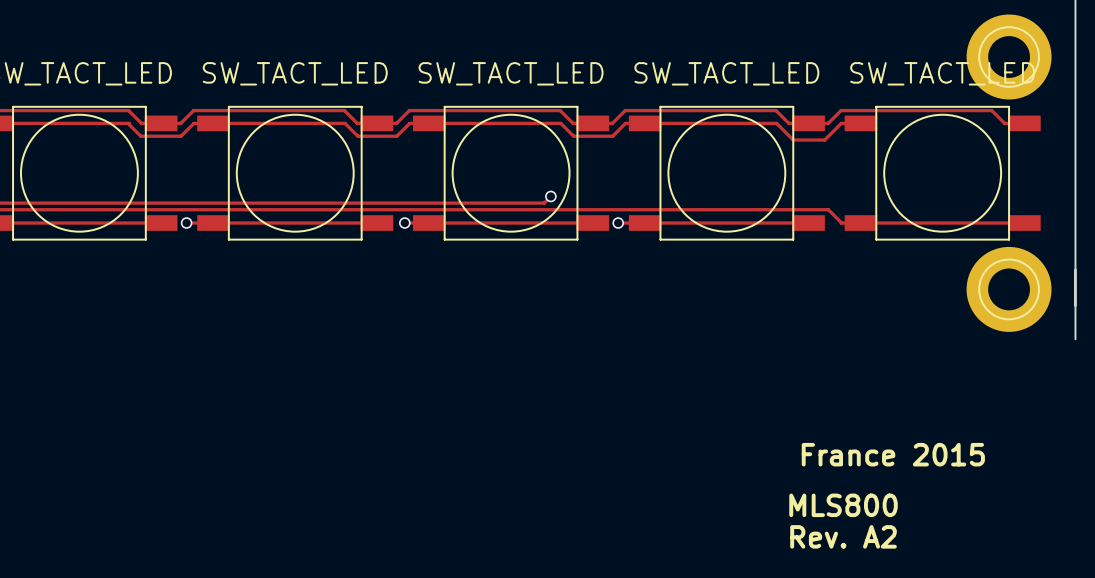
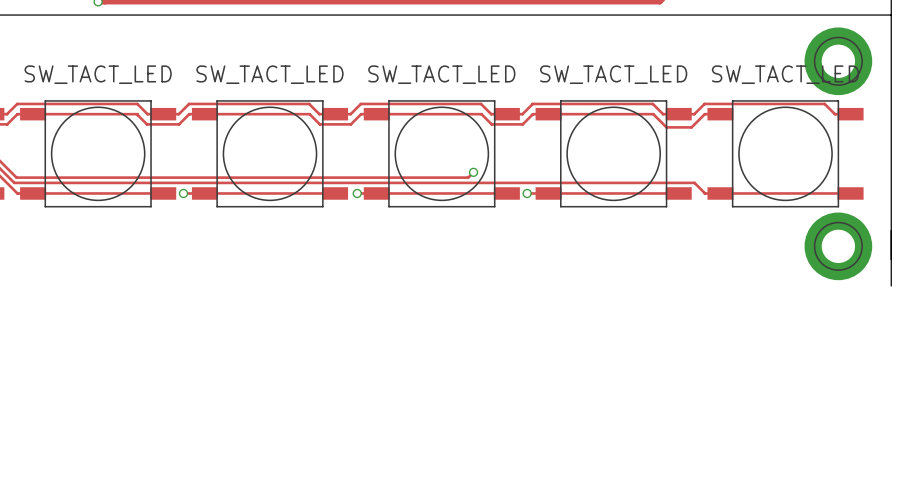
text: France 2015 (893, 454) -> none
text: MLS800 (843, 505) -> none
text: Rev. A2 (843, 536) -> none

